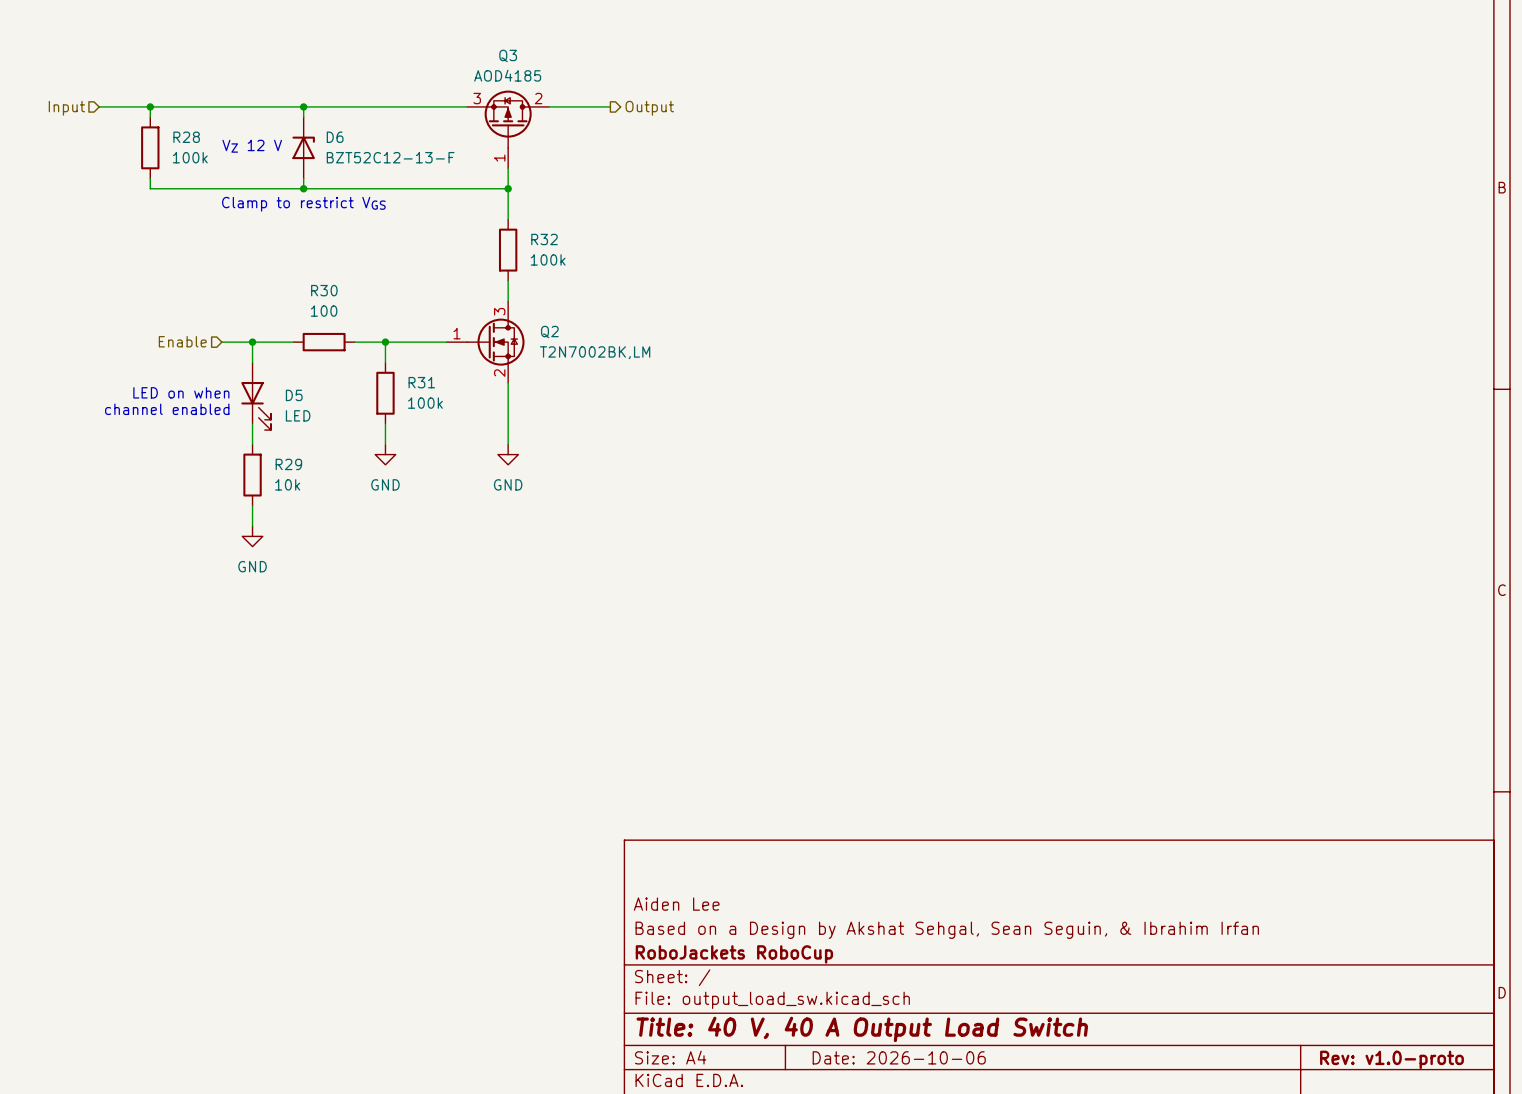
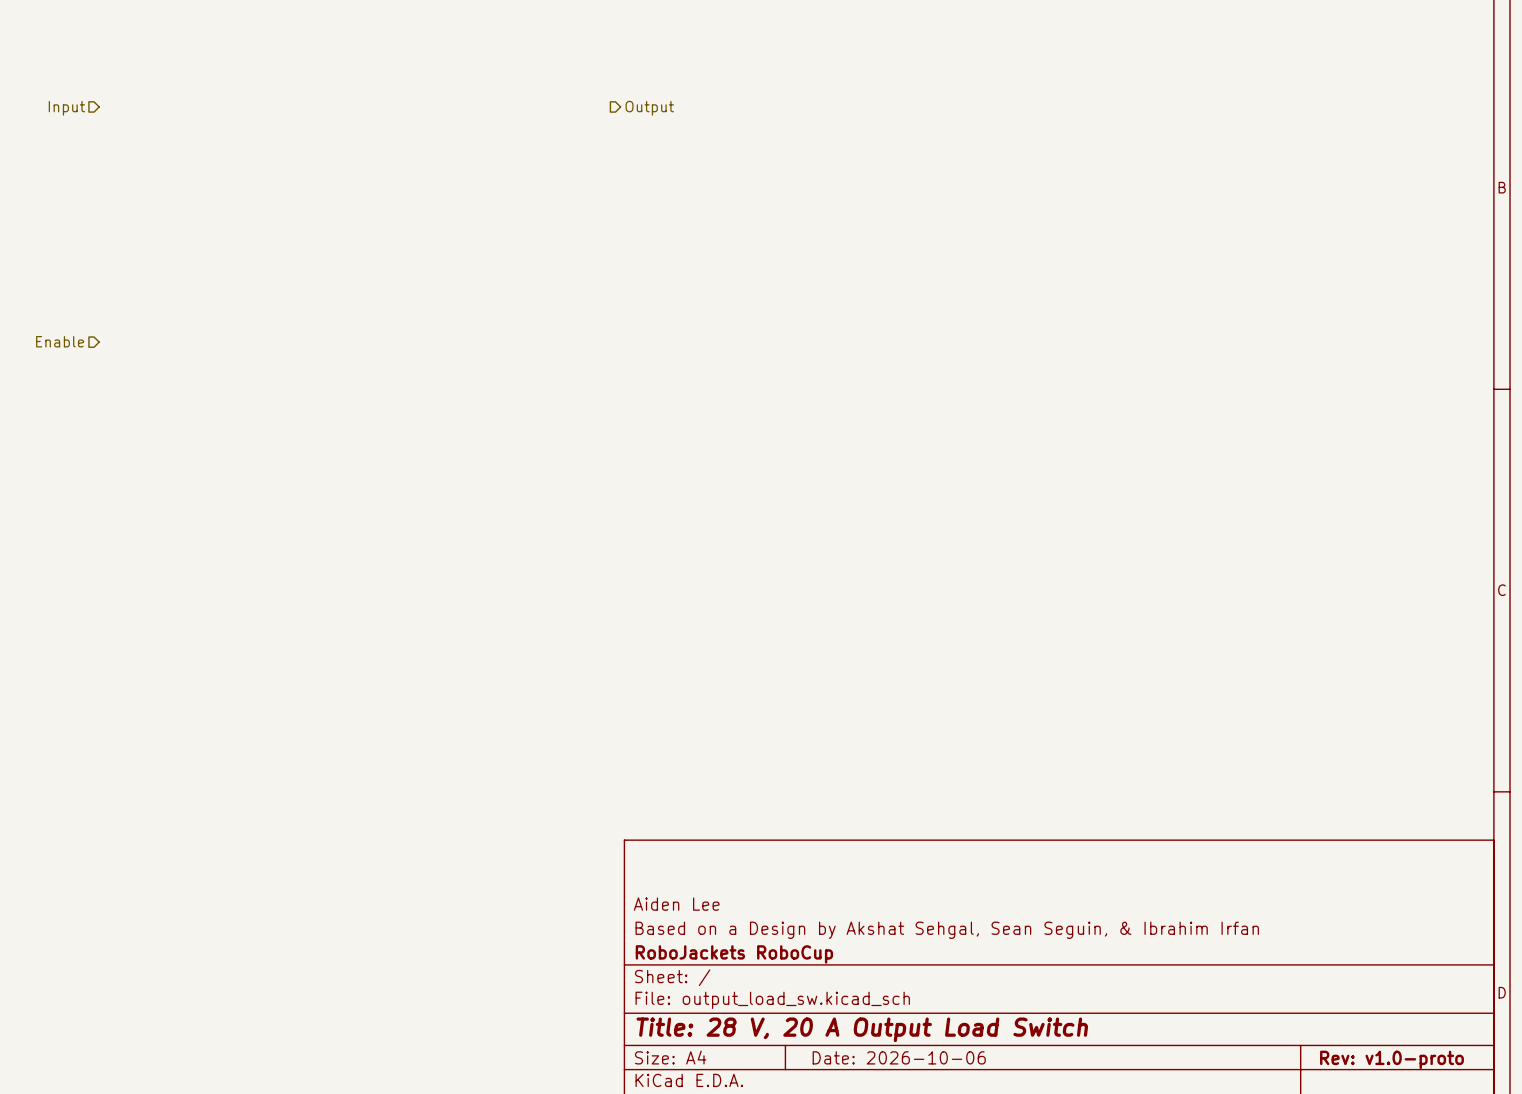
wire: (99, 106) (467, 106) -> none
wire: (150, 106) (150, 117) -> none
junction: (150, 106) -> none
wire: (303, 106) (303, 117) -> none
junction: (303, 106) -> none
wire: (549, 106) (610, 106) -> none
Q3: AOD4185 (508, 129) -> none
text: VZ 12 V (252, 146) -> none
R28: 100k (150, 147) -> none
D6: BZT52C12-13-F (303, 147) -> none
wire: (508, 168) (508, 219) -> none
wire: (150, 178) (150, 188) (508, 188) -> none
wire: (303, 178) (303, 188) -> none
junction: (303, 188) -> none
junction: (508, 188) -> none
text: Clamp to restrict VGS (303, 204) -> none
R32: 100k (508, 250) -> none
wire: (508, 280) (508, 301) -> none
hierarchical label position: Enable (182, 341) -> Enable (60, 341)
wire: (221, 342) (293, 342) -> none
wire: (252, 342) (252, 362) -> none
junction: (252, 342) -> none
R30: 100 (324, 342) -> none
wire: (354, 342) (446, 342) -> none
wire: (385, 342) (385, 362) -> none
junction: (385, 342) -> none
Q2: T2N7002BK,LM (485, 342) -> none
wire: (508, 383) (508, 444) -> none
text: LED on when (181, 392) -> none
R31: 100k (385, 393) -> none
D5: LED (256, 396) -> none
text: channel enabled (167, 409) -> none
wire: (252, 423) (252, 444) -> none
wire: (385, 423) (385, 444) -> none
power symbol: GND (385, 454) -> none
power symbol: GND (508, 454) -> none
R29: 10k (252, 475) -> none
wire: (252, 505) (252, 526) -> none
power symbol: GND (252, 536) -> none
title block: Title: 40 V, 40 A Output Load Switch (862, 1029) -> Title: 28 V, 20 A Output Load Switch (862, 1029)

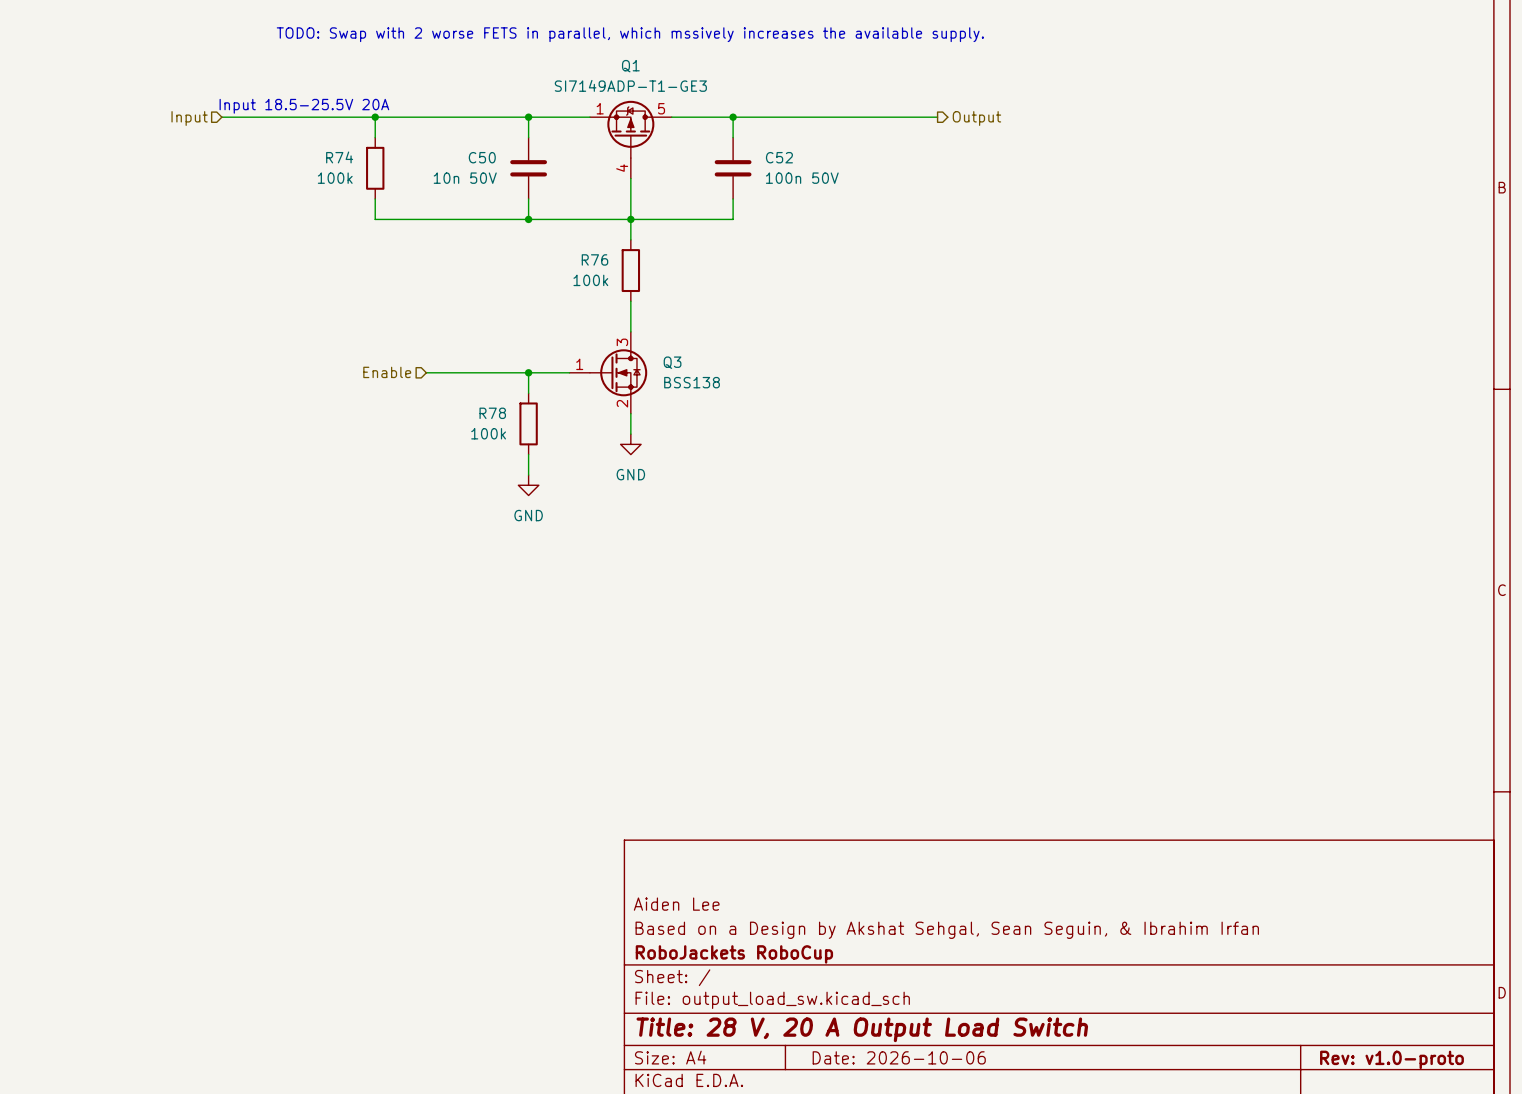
text: none -> TODO: Swap with 2 worse FETS in parallel, which mssively increases the available supply. (630, 34)
text: none -> Input 18.5-25.5V 20A (304, 106)
hierarchical label position: Input (66, 108) -> Input (189, 118)
hierarchical label: Output (649, 108) -> none
wire: none -> (221, 117) (589, 117)
wire: none -> (375, 117) (375, 137)
junction: none -> (375, 117)
wire: none -> (528, 117) (528, 137)
junction: none -> (528, 117)
wire: none -> (671, 117) (937, 117)
wire: none -> (733, 117) (733, 137)
junction: none -> (733, 117)
hierarchical label: none -> Output (976, 118)
Q1: none -> SI7149ADP-T1-GE3 (630, 139)
R74: none -> 100k (375, 168)
C50: none -> 10n 50V (528, 168)
C52: none -> 100n 50V (733, 168)
wire: none -> (630, 178) (630, 239)
wire: none -> (375, 198) (375, 219) (733, 219) (733, 198)
wire: none -> (528, 198) (528, 219)
junction: none -> (528, 219)
junction: none -> (630, 219)
R76: none -> 100k (630, 270)
wire: none -> (630, 301) (630, 331)
hierarchical label: Enable (60, 341) -> none
hierarchical label: none -> Enable (387, 372)
wire: none -> (426, 372) (569, 372)
wire: none -> (528, 372) (528, 393)
junction: none -> (528, 372)
Q3: none -> BSS138 (608, 372)
wire: none -> (630, 413) (630, 434)
R78: none -> 100k (528, 423)
power symbol: none -> GND (630, 444)
wire: none -> (528, 454) (528, 475)
power symbol: none -> GND (528, 485)

